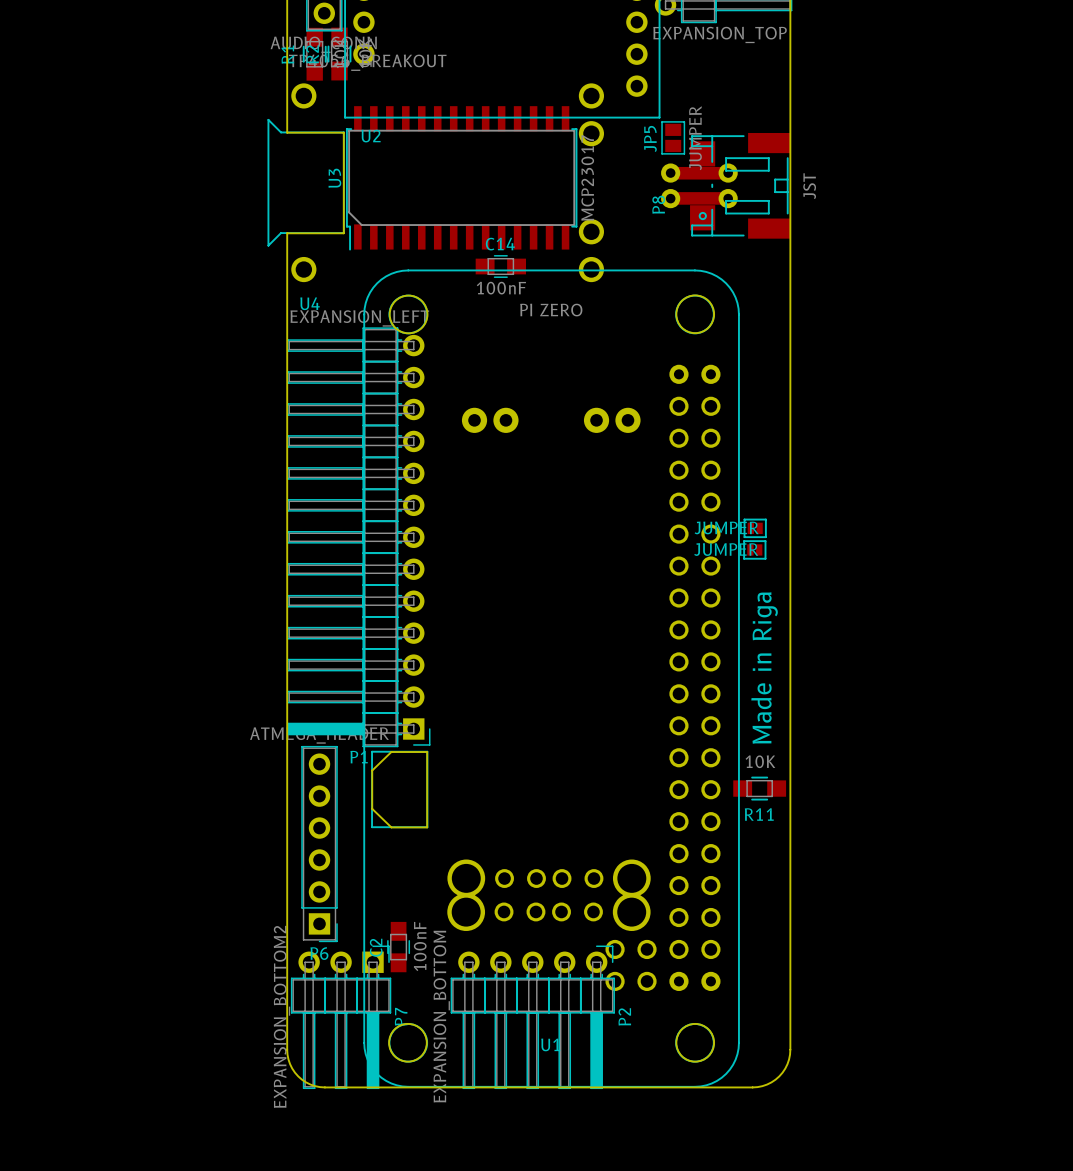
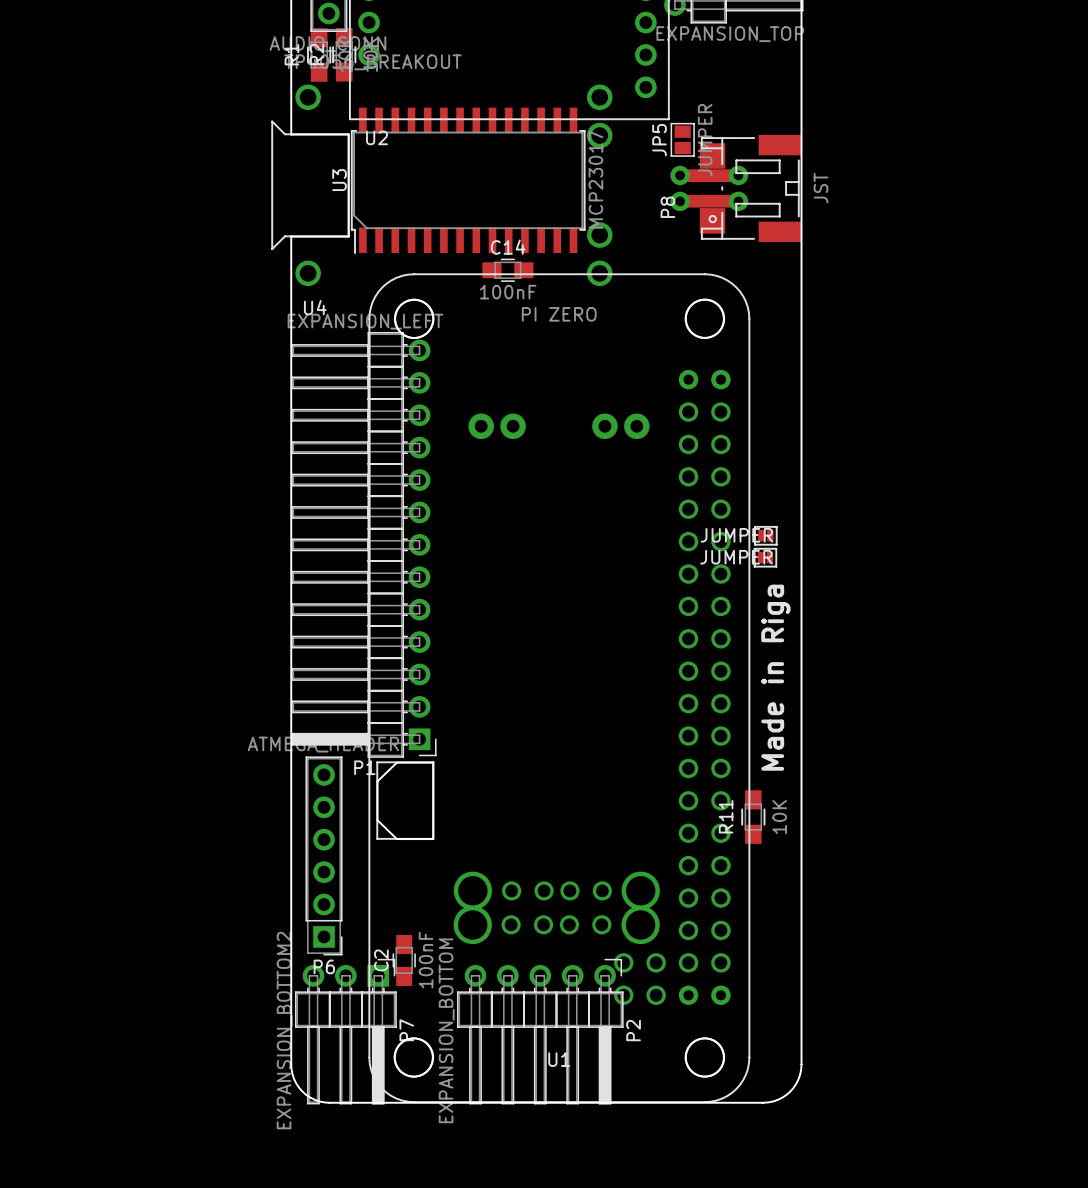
R11 rotation: 0° (759, 788) -> 90° clockwise (753, 817)

